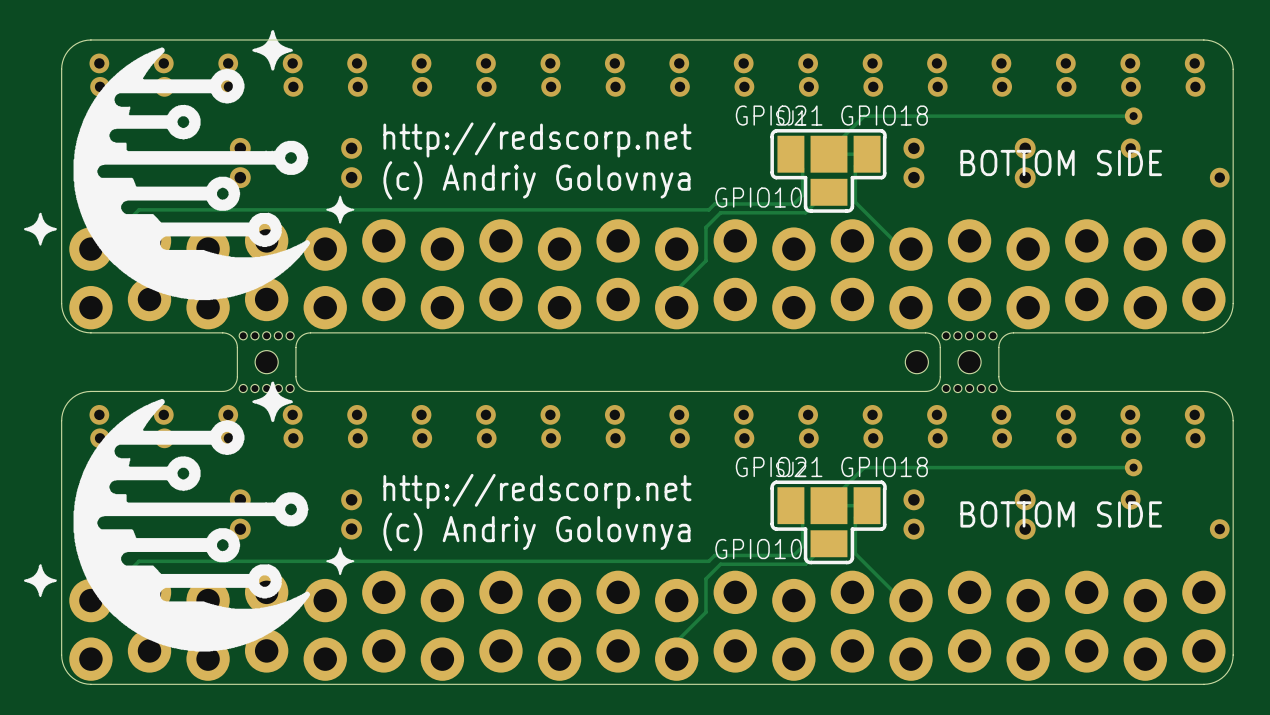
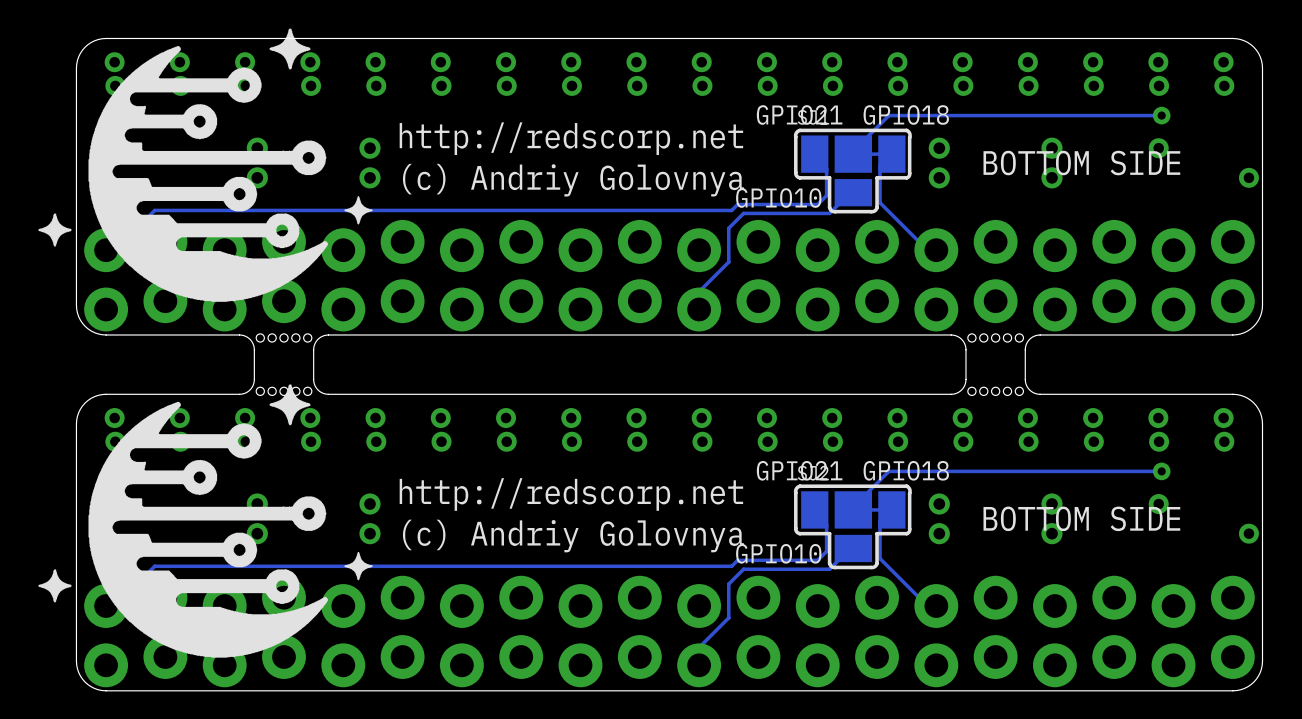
hole: (266, 362) -> none
hole: (916, 362) -> none
hole: (969, 362) -> none

